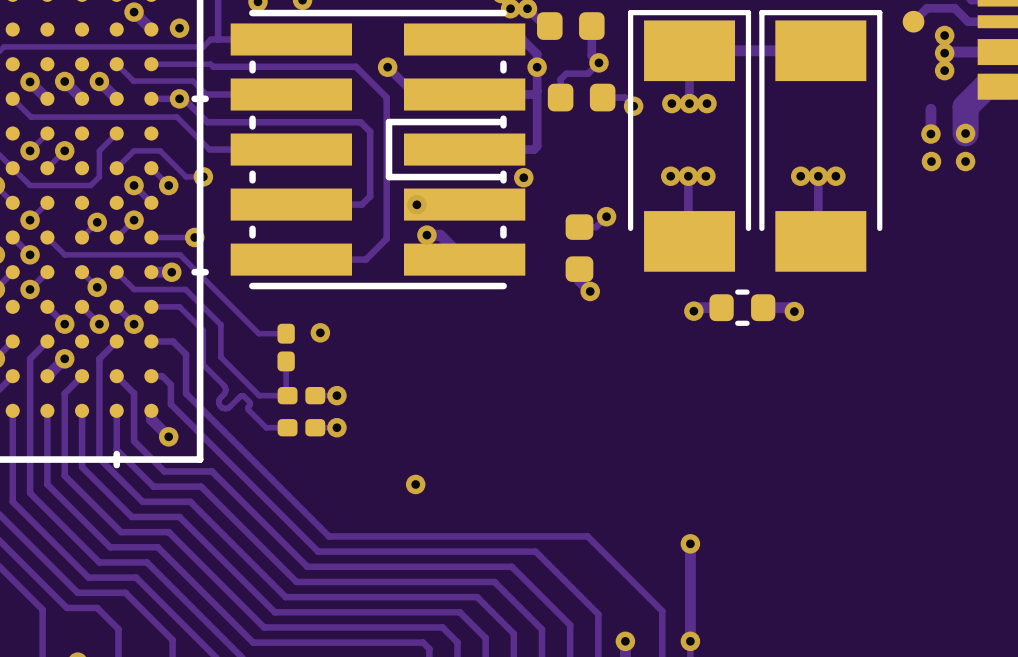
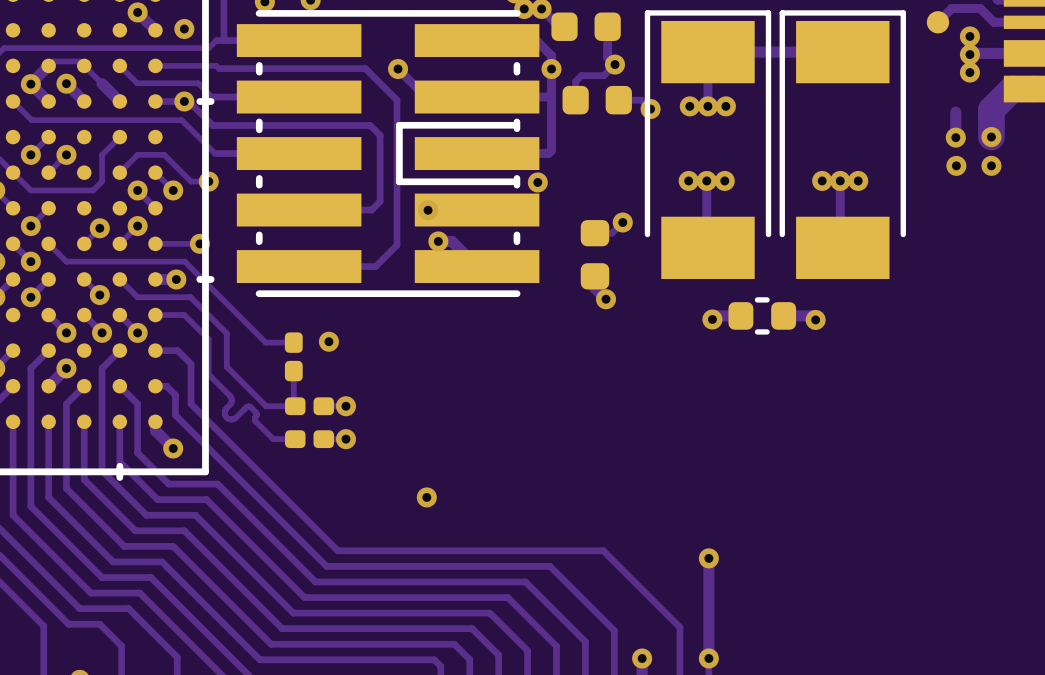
track: none -> (30, 83) (53, 61) (79, 61) (102, 83)
via: (99, 81) -> none

